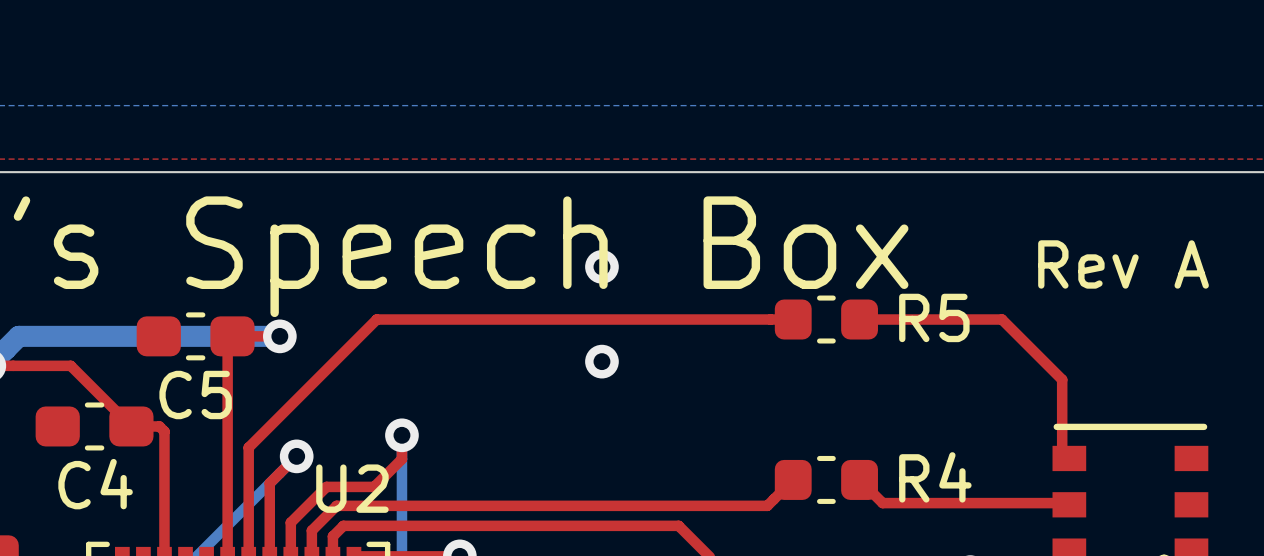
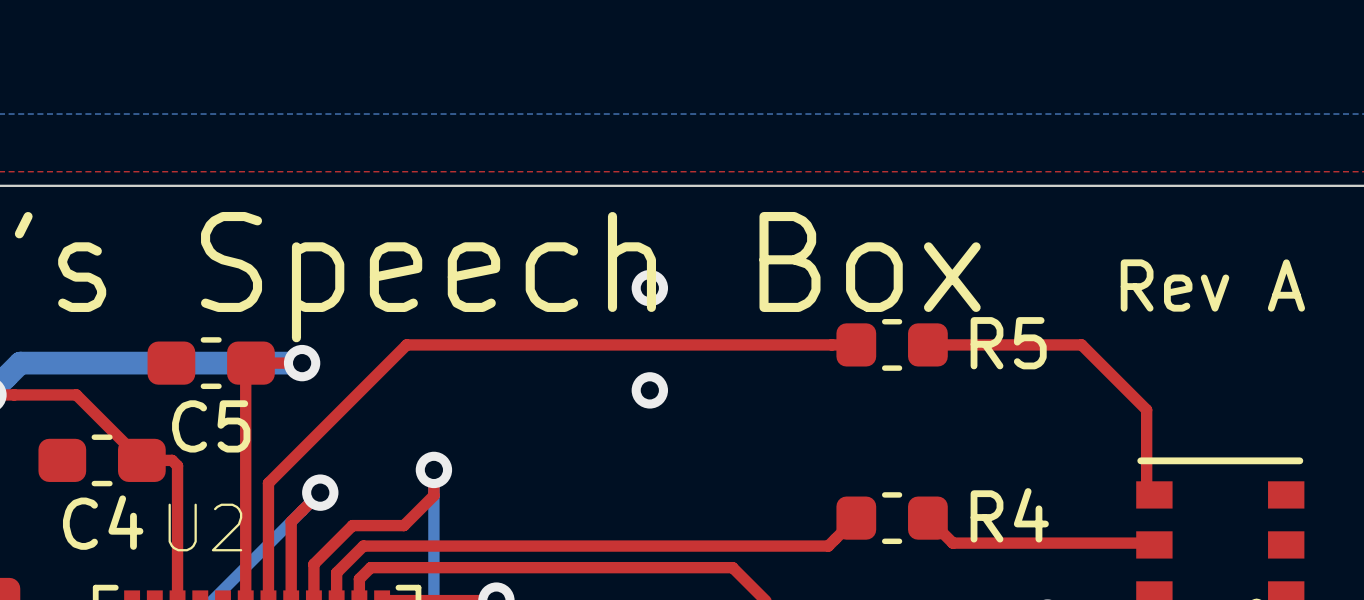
U2 name position: U2 (352, 488) -> U2 (205, 527)

